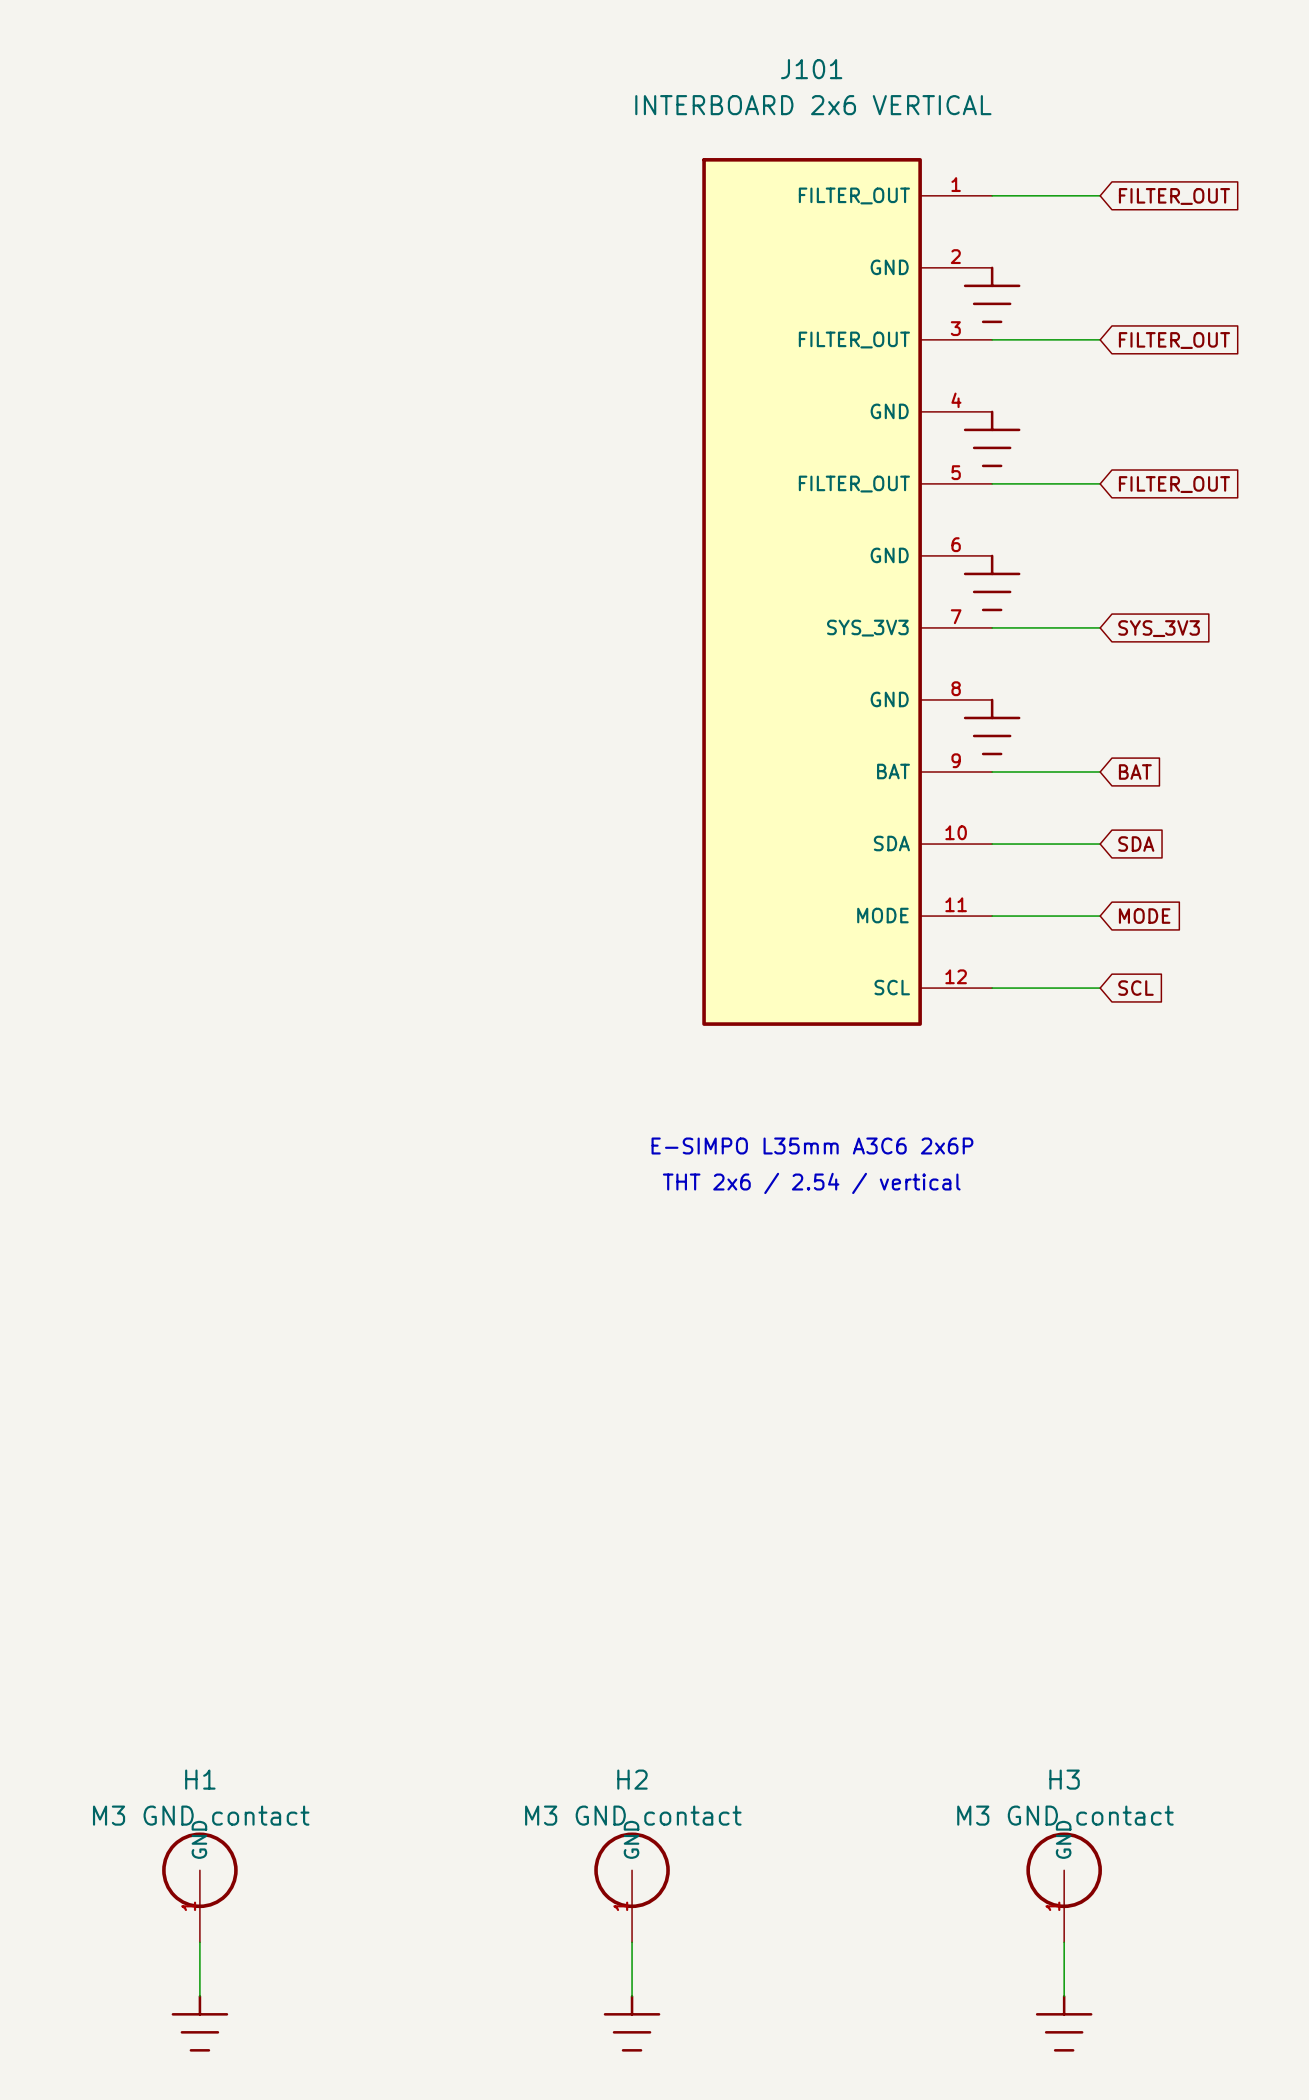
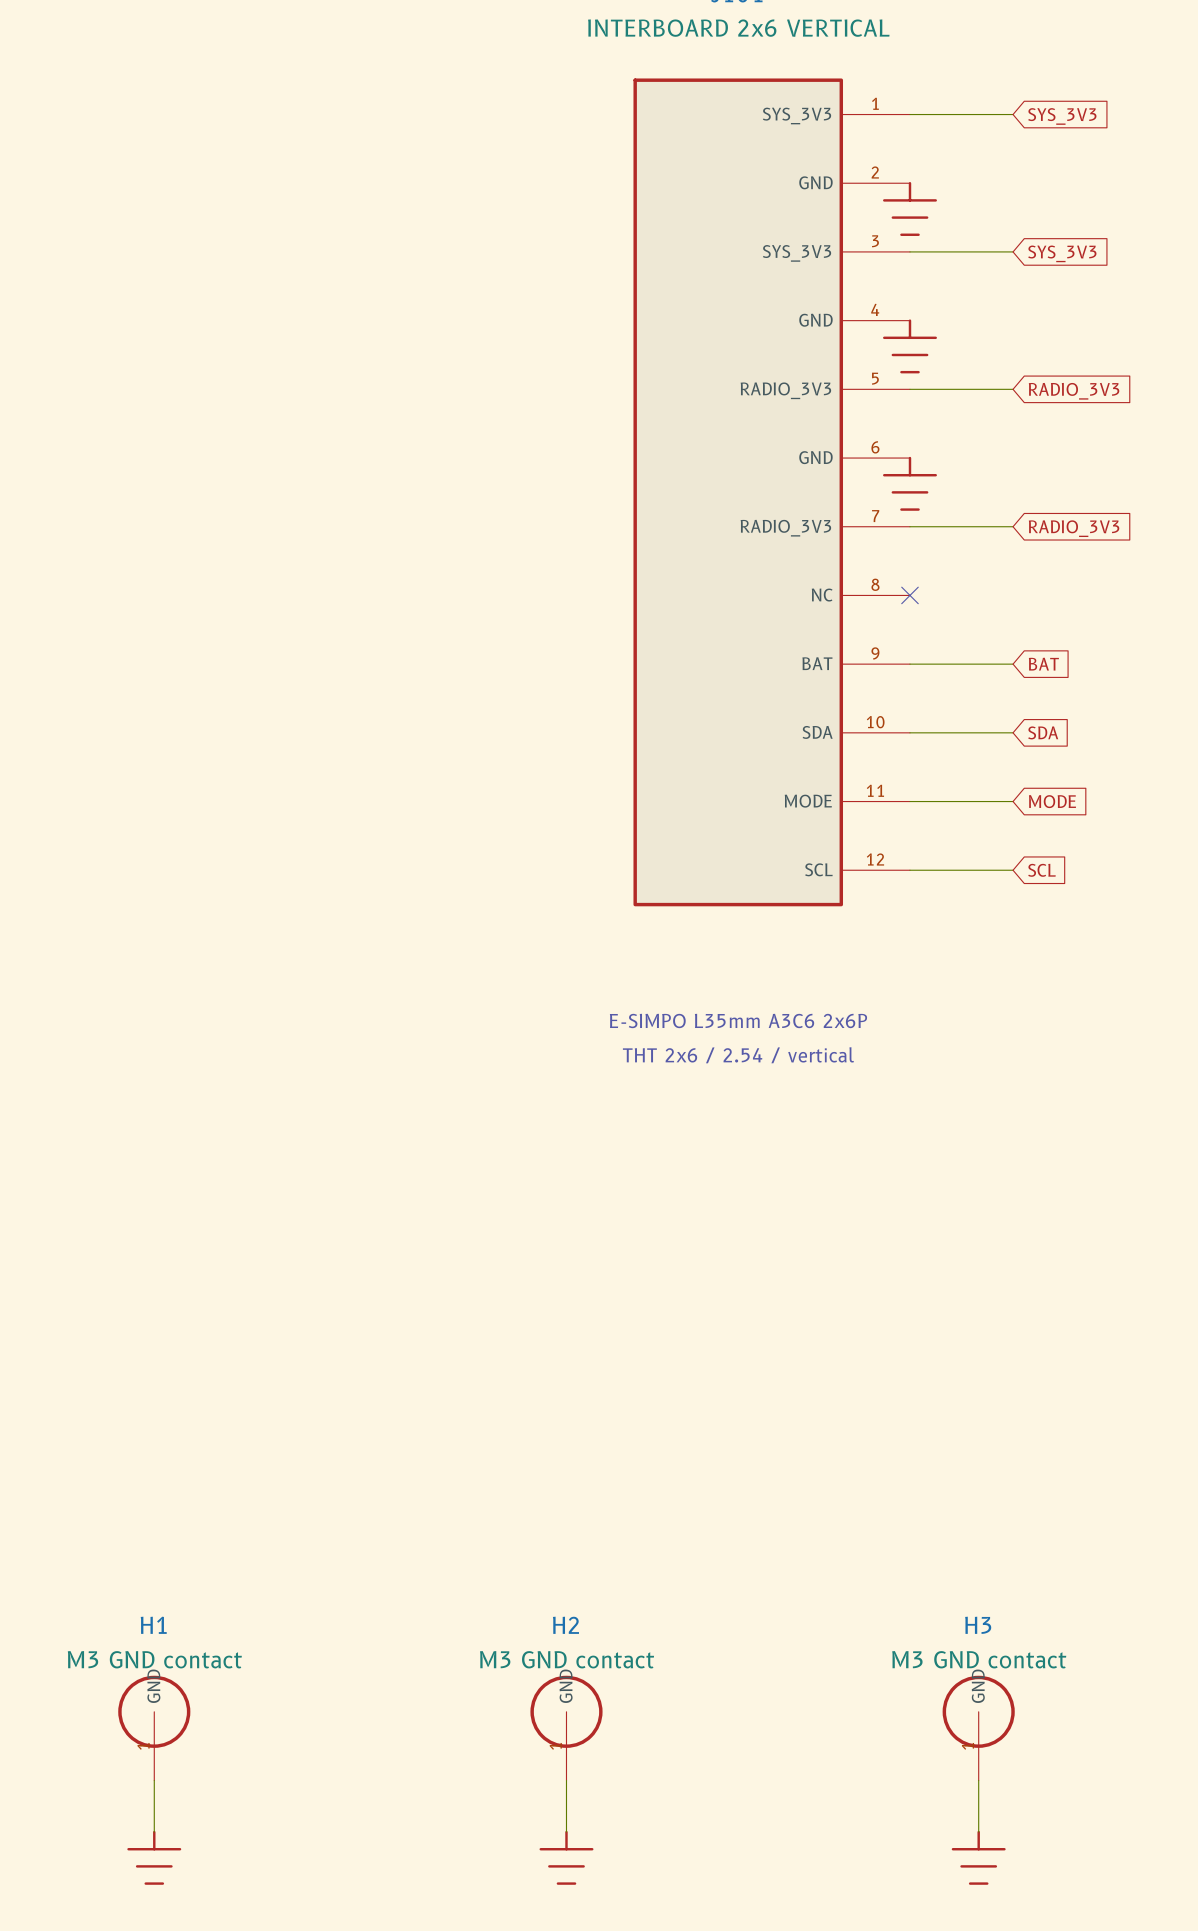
J101 pin name: FILTER_OUT (854, 195) -> SYS_3V3 (797, 115)
global label: FILTER_OUT (1174, 196) -> SYS_3V3 (1062, 116)
J101 pin name: FILTER_OUT (854, 340) -> SYS_3V3 (797, 253)
global label: FILTER_OUT (1174, 340) -> SYS_3V3 (1062, 253)
J101 pin name: FILTER_OUT (854, 484) -> RADIO_3V3 (785, 390)
global label: FILTER_OUT (1174, 484) -> RADIO_3V3 (1074, 391)
J101 pin name: SYS_3V3 (867, 628) -> RADIO_3V3 (785, 528)
global label: SYS_3V3 (1159, 628) -> RADIO_3V3 (1074, 528)
J101 pin name: GND (889, 699) -> NC (822, 595)
no-connect mark: none -> (909, 595)
power symbol: (992, 726) -> none

